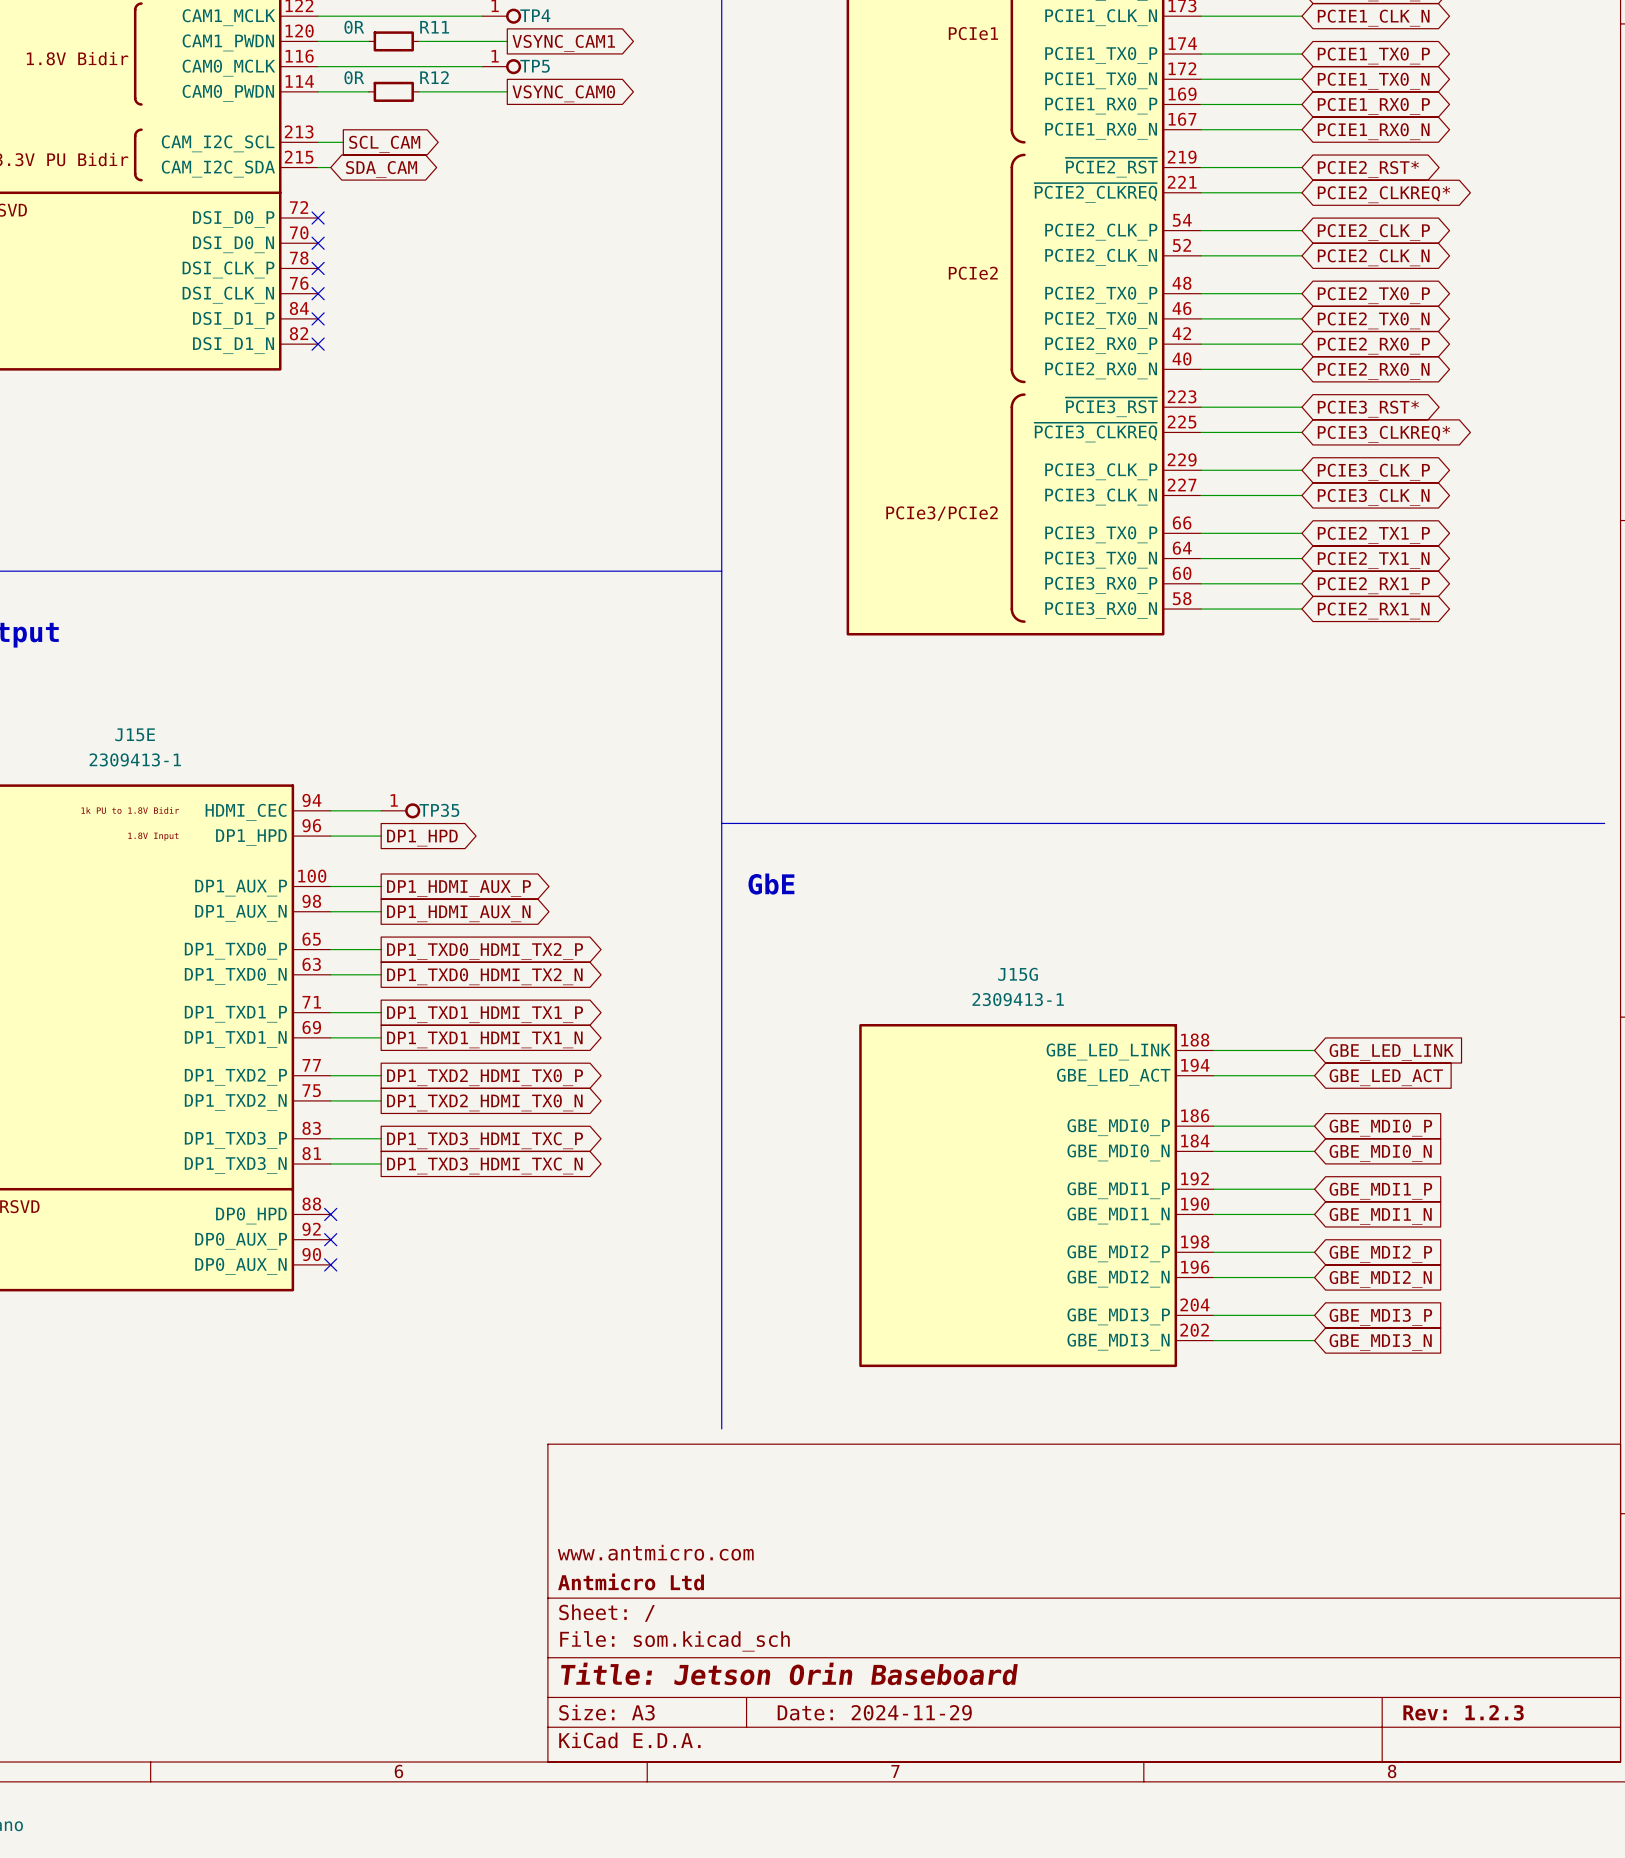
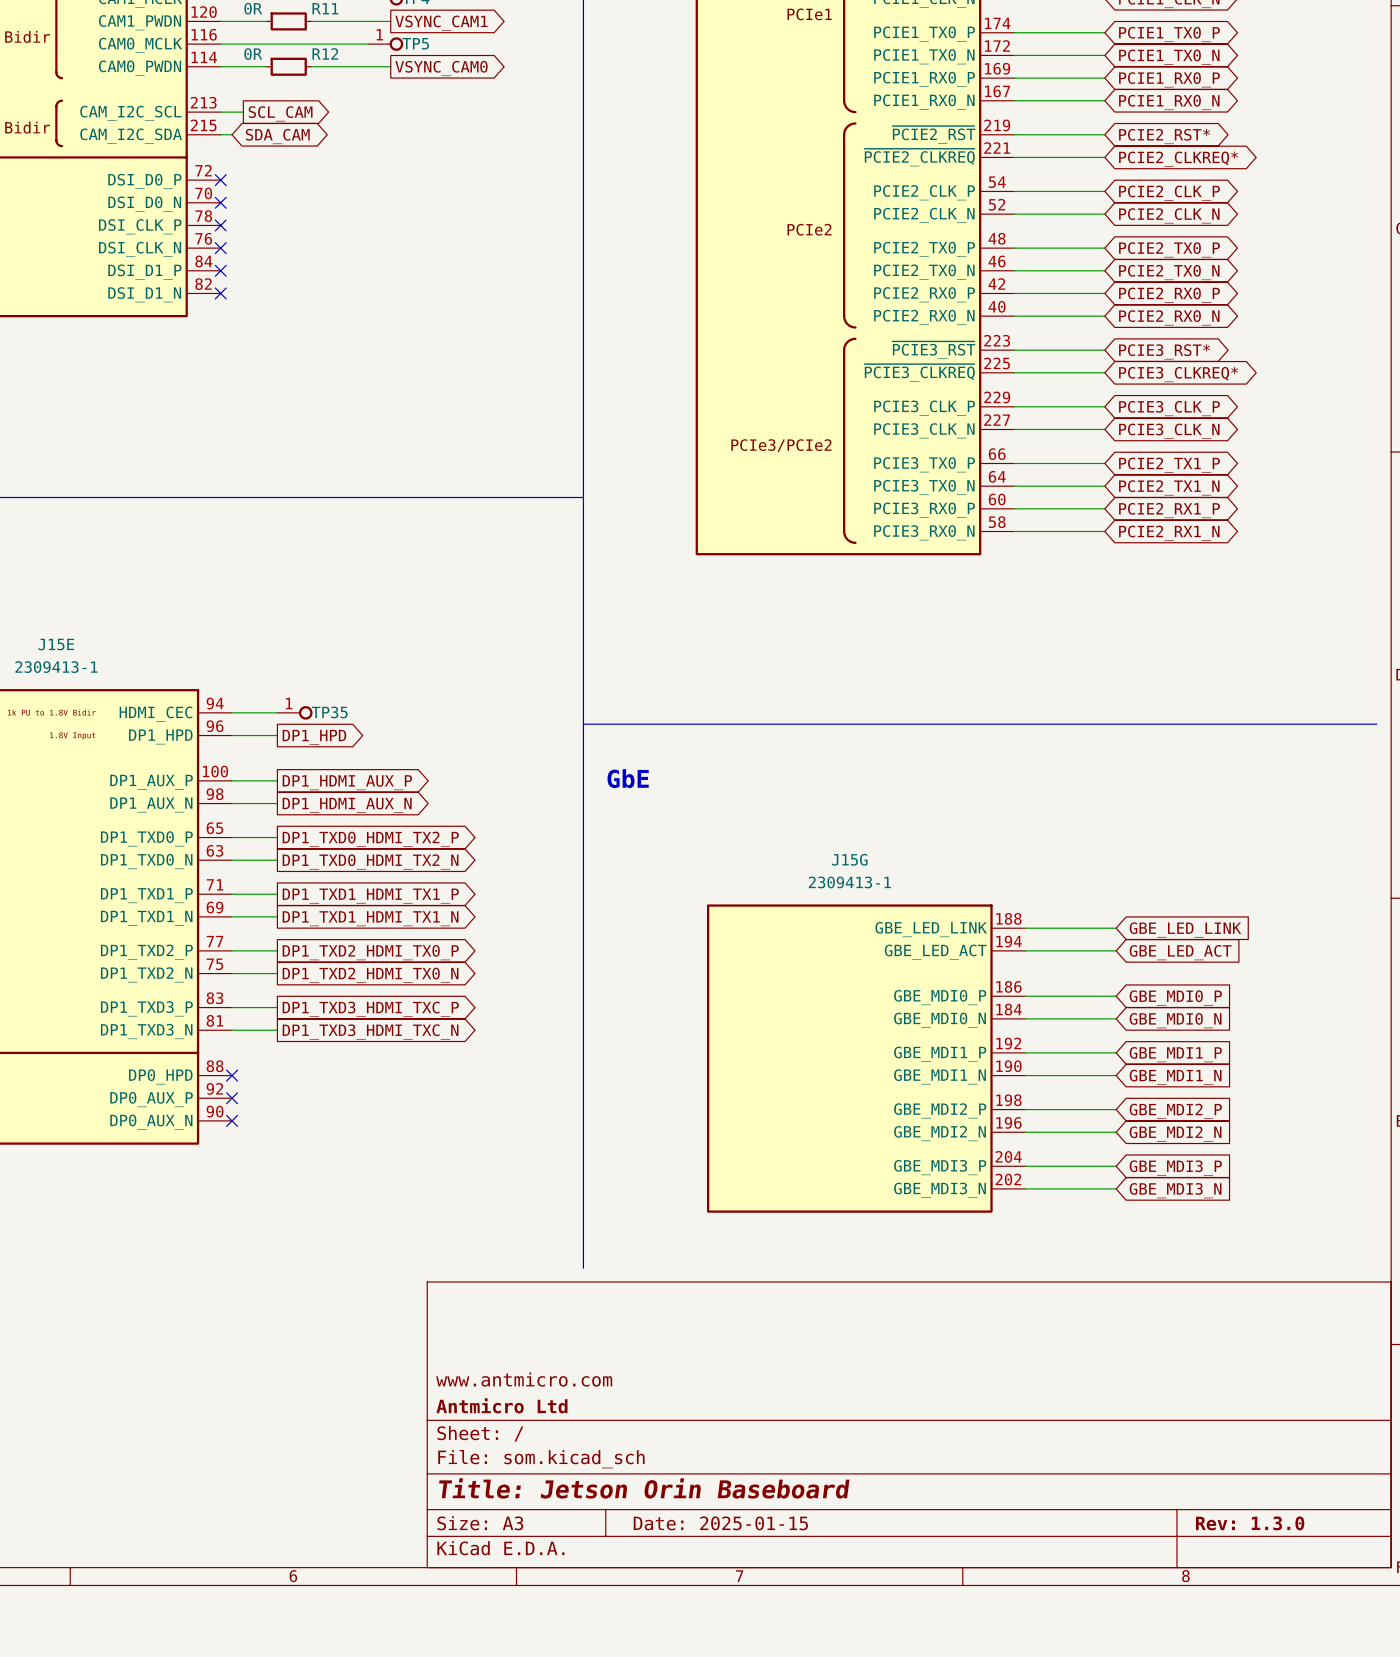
title block: Date: 2024-11-29 (874, 1712) -> Date: 2025-01-15 (720, 1523)
title block: Rev: 1.2.3 (1463, 1712) -> Rev: 1.3.0 (1250, 1523)

